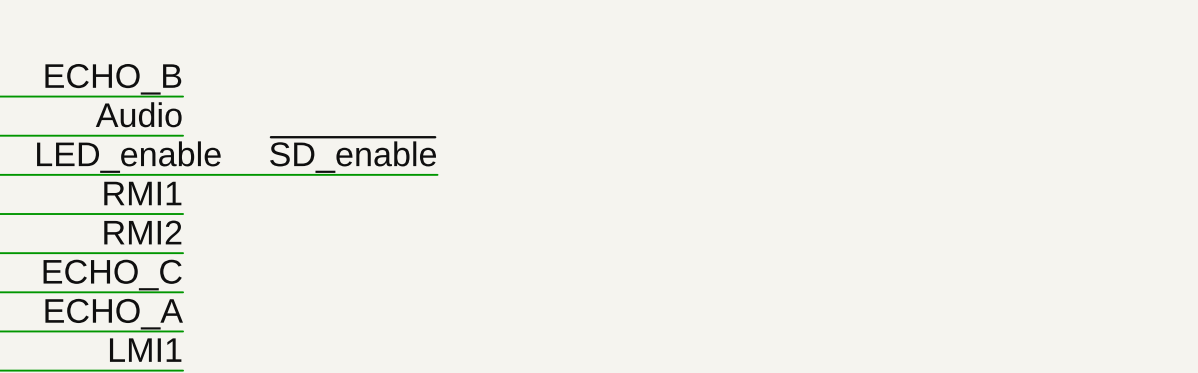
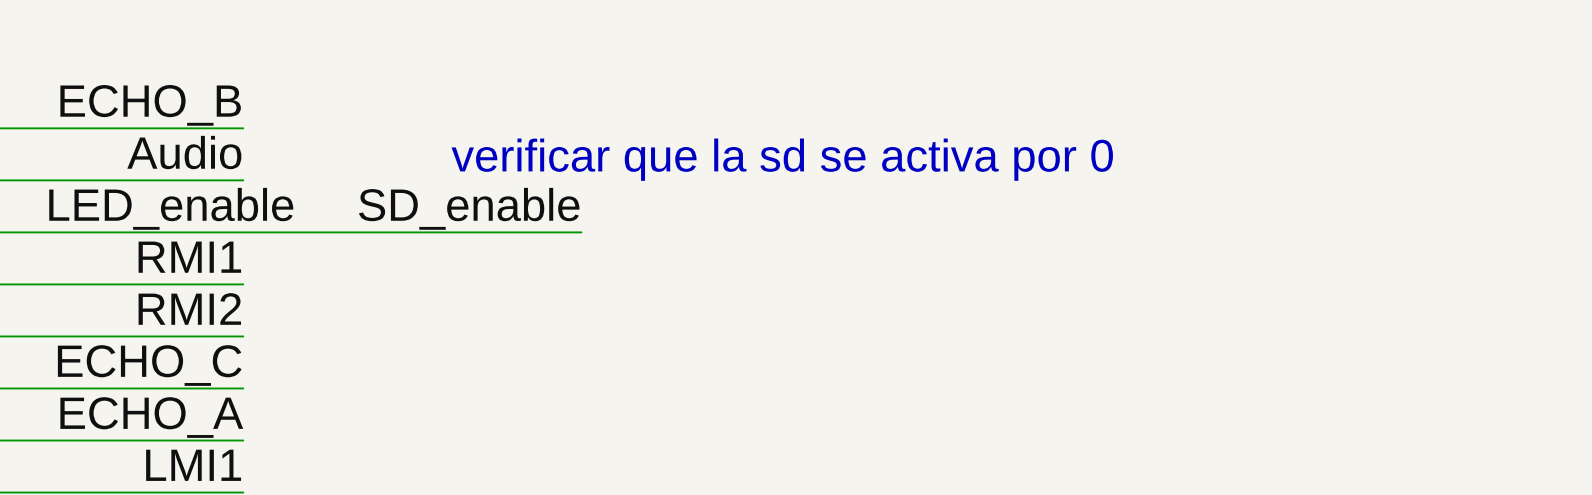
text: none -> verificar que la sd se activa por 0 (782, 159)
label: ~{SD_enable} (353, 155) -> SD_enable (469, 208)

